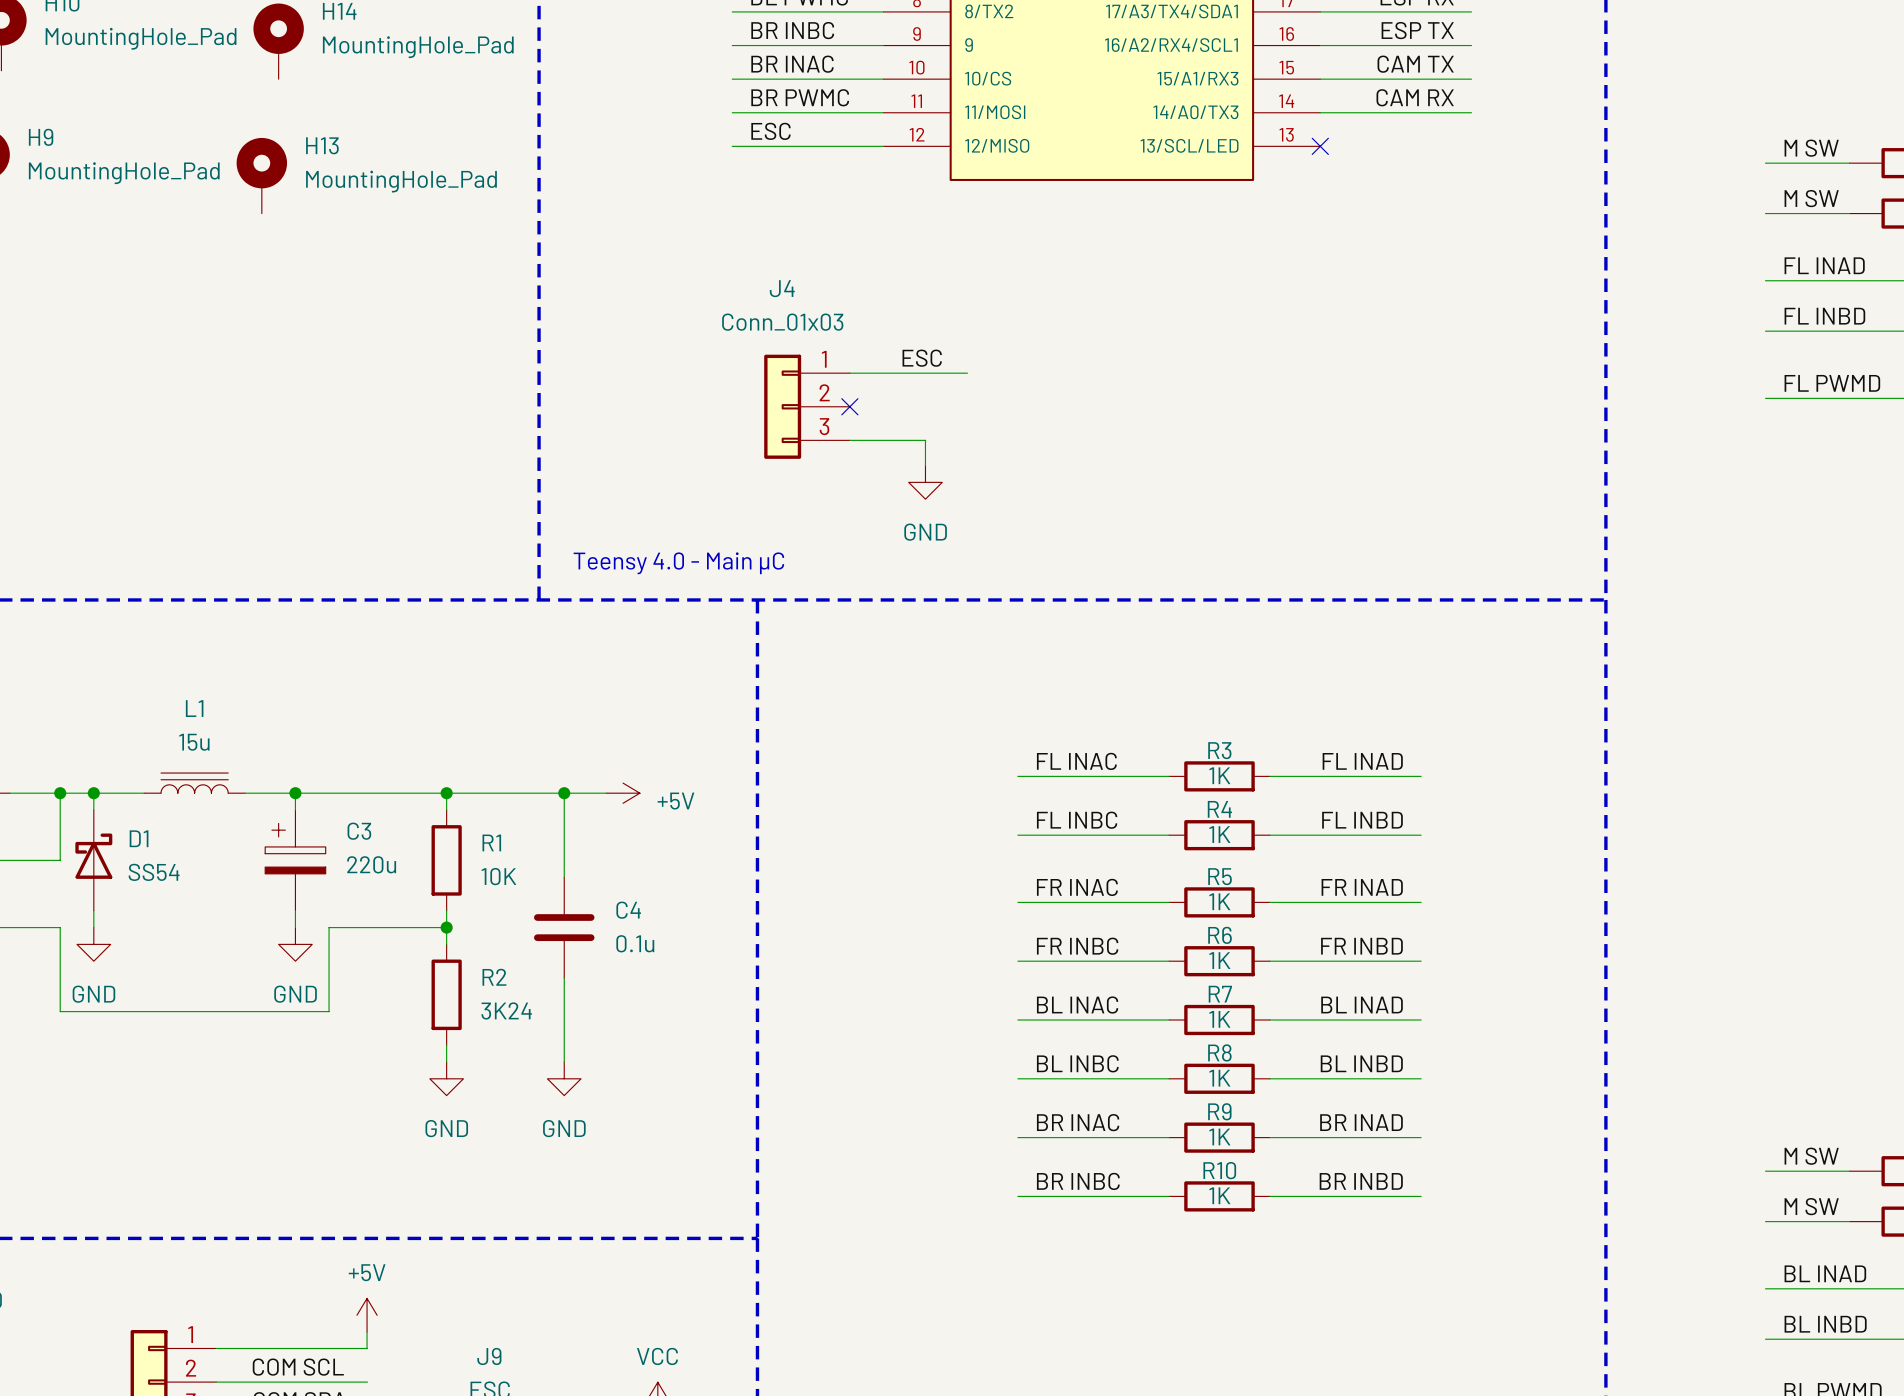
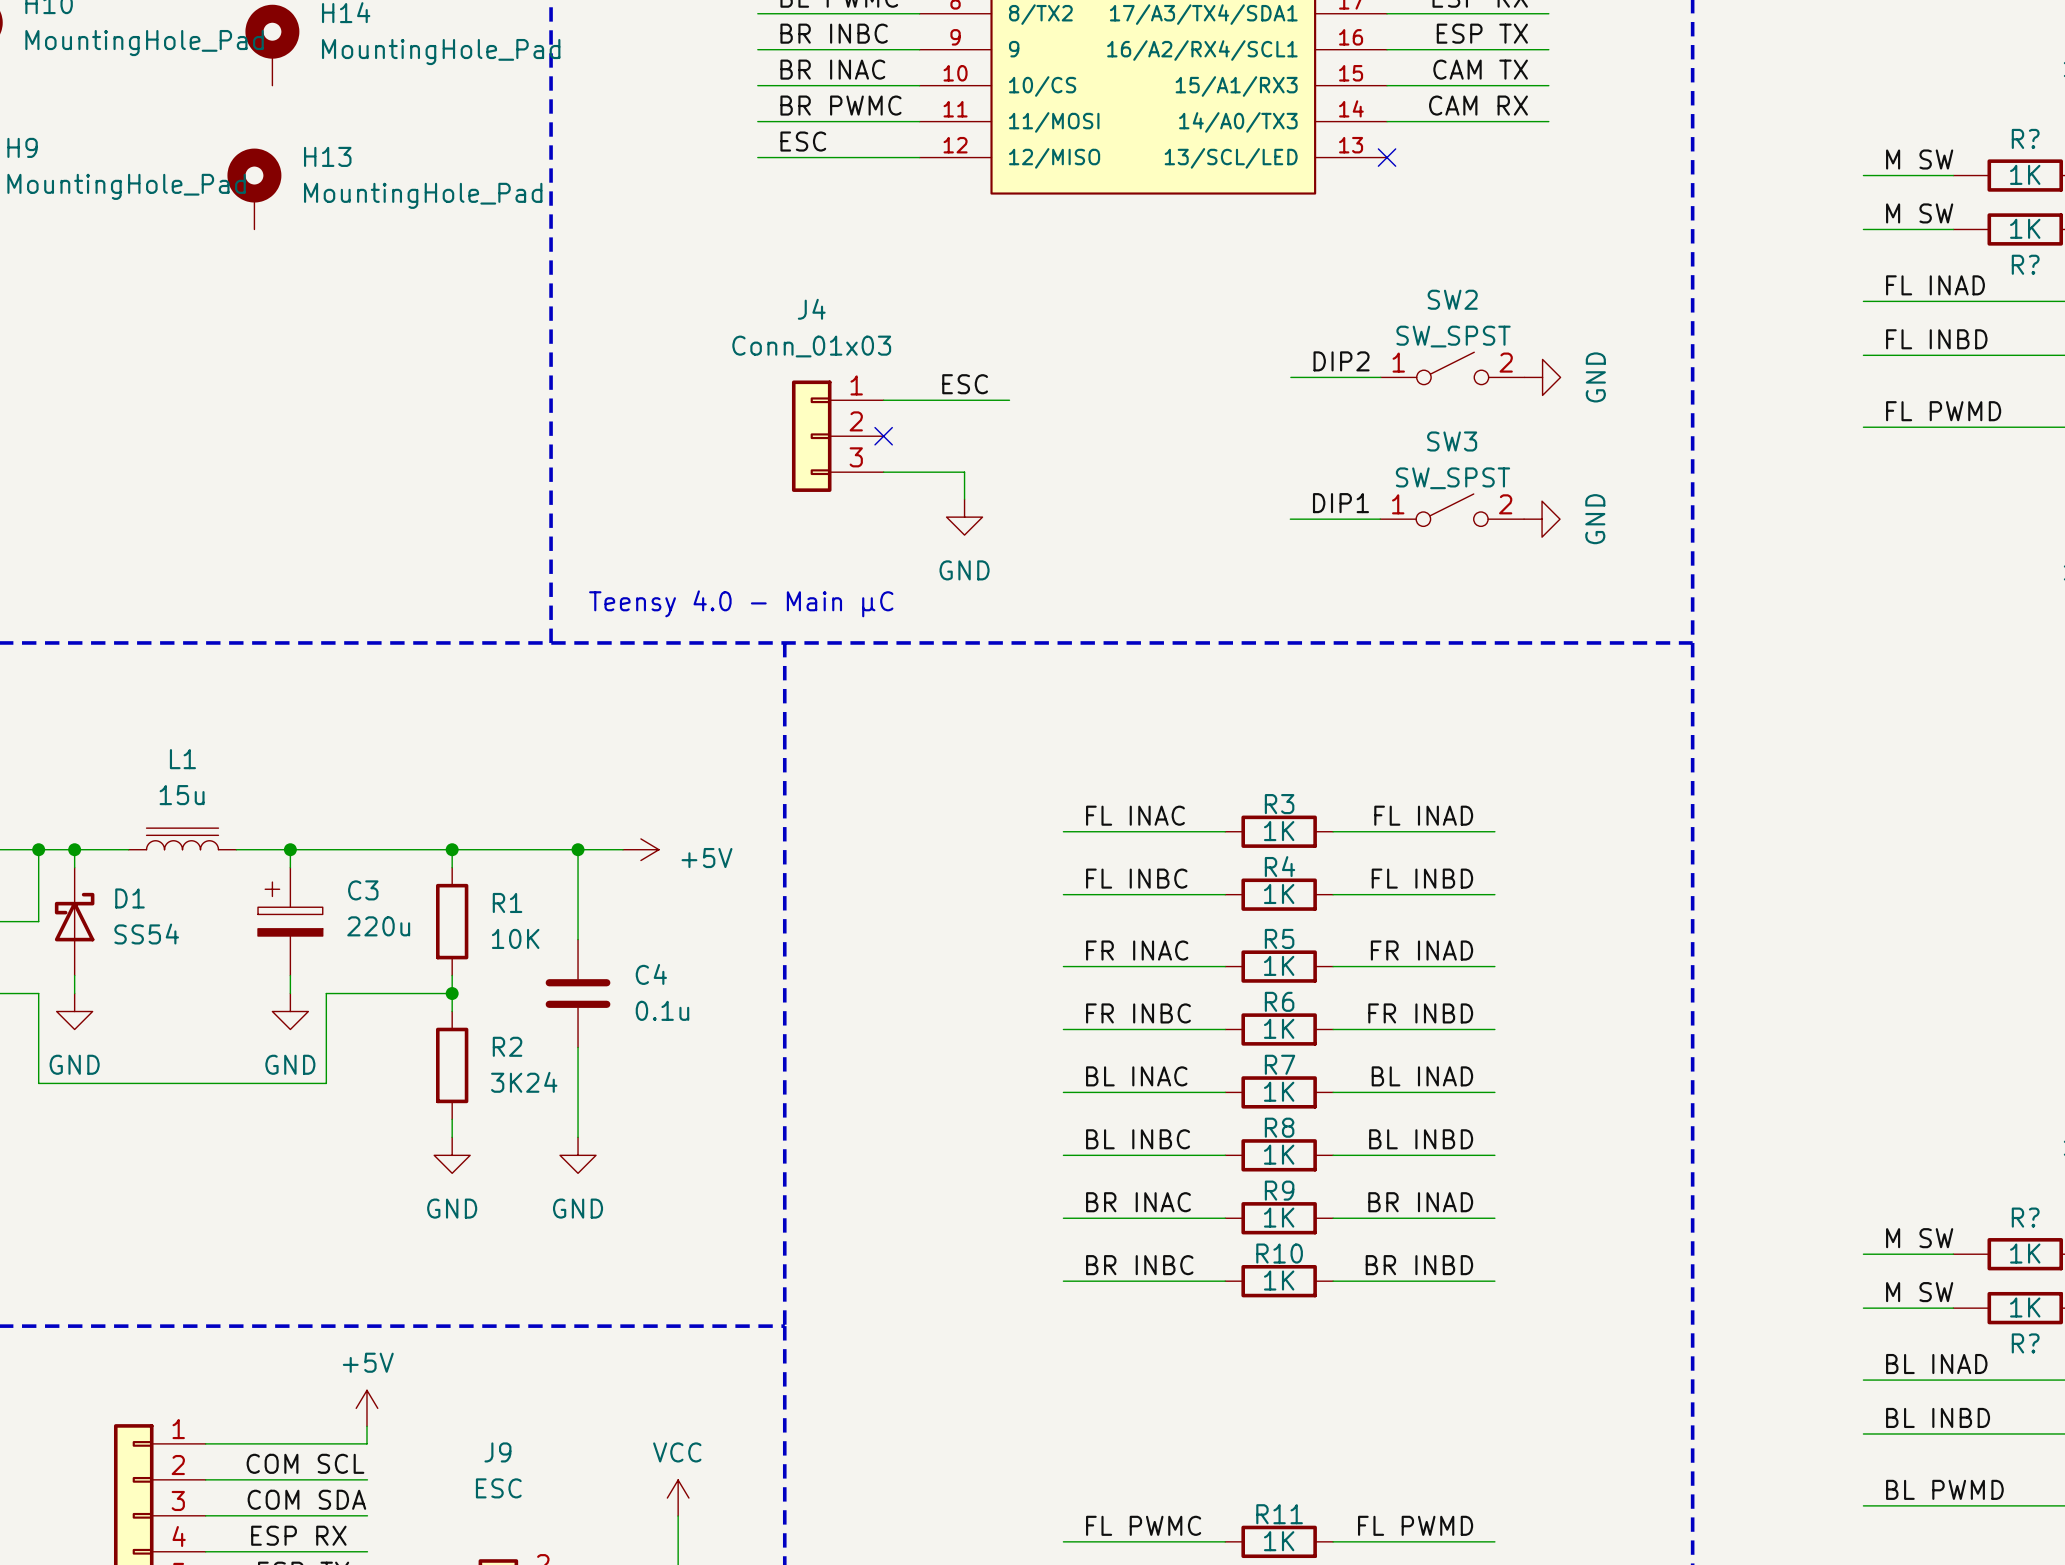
label: none -> DIP2 (1341, 361)
SW2: none -> SW_SPST (1452, 368)
wire: none -> (1290, 377) (1380, 377)
power symbol: none -> GND (1542, 377)
label: none -> DIP1 (1340, 503)
SW3: none -> SW_SPST (1452, 510)
wire: none -> (1290, 519) (1380, 519)
power symbol: none -> GND (1542, 519)

